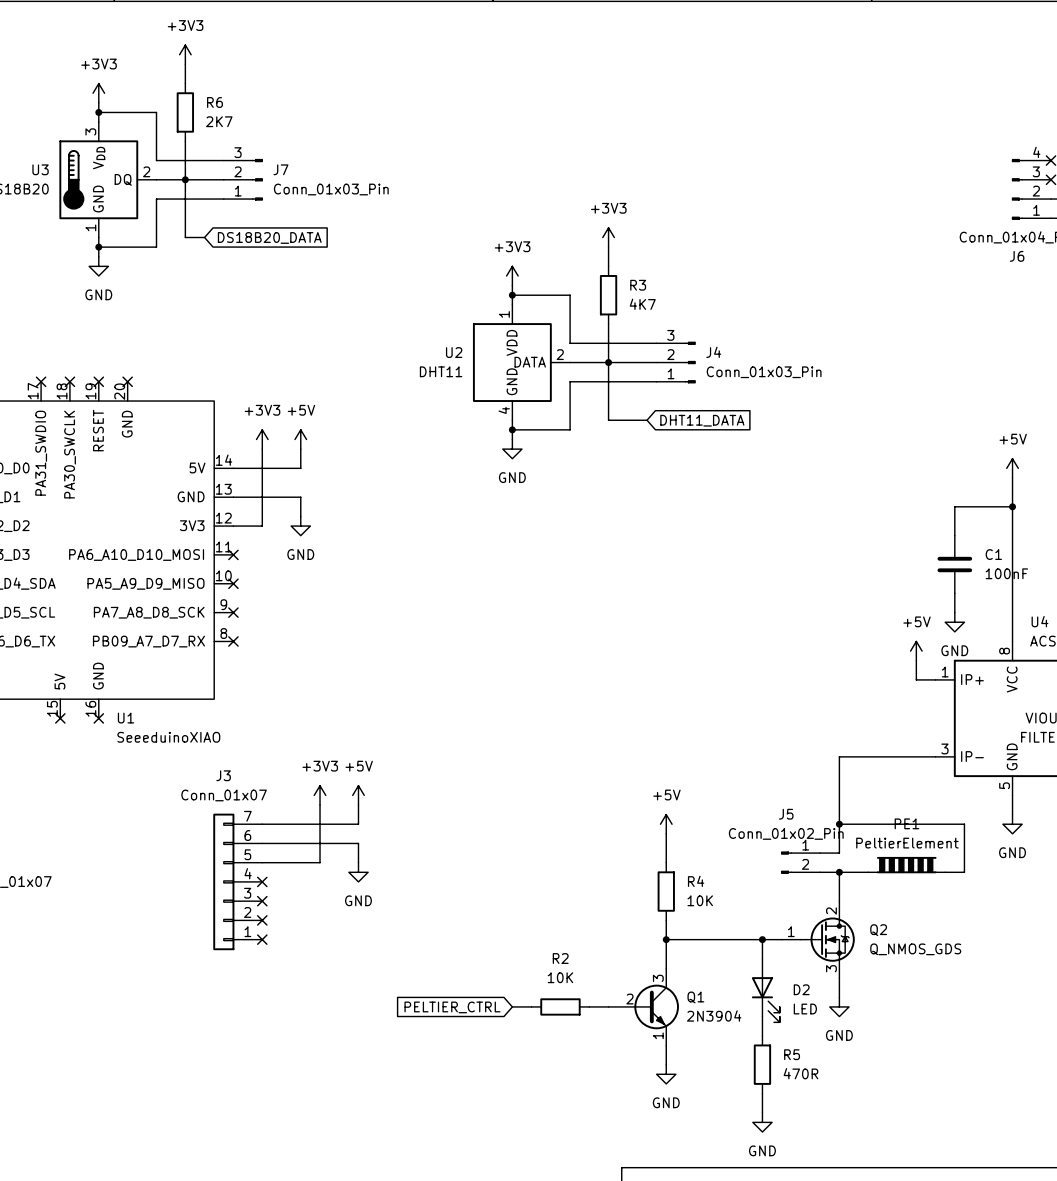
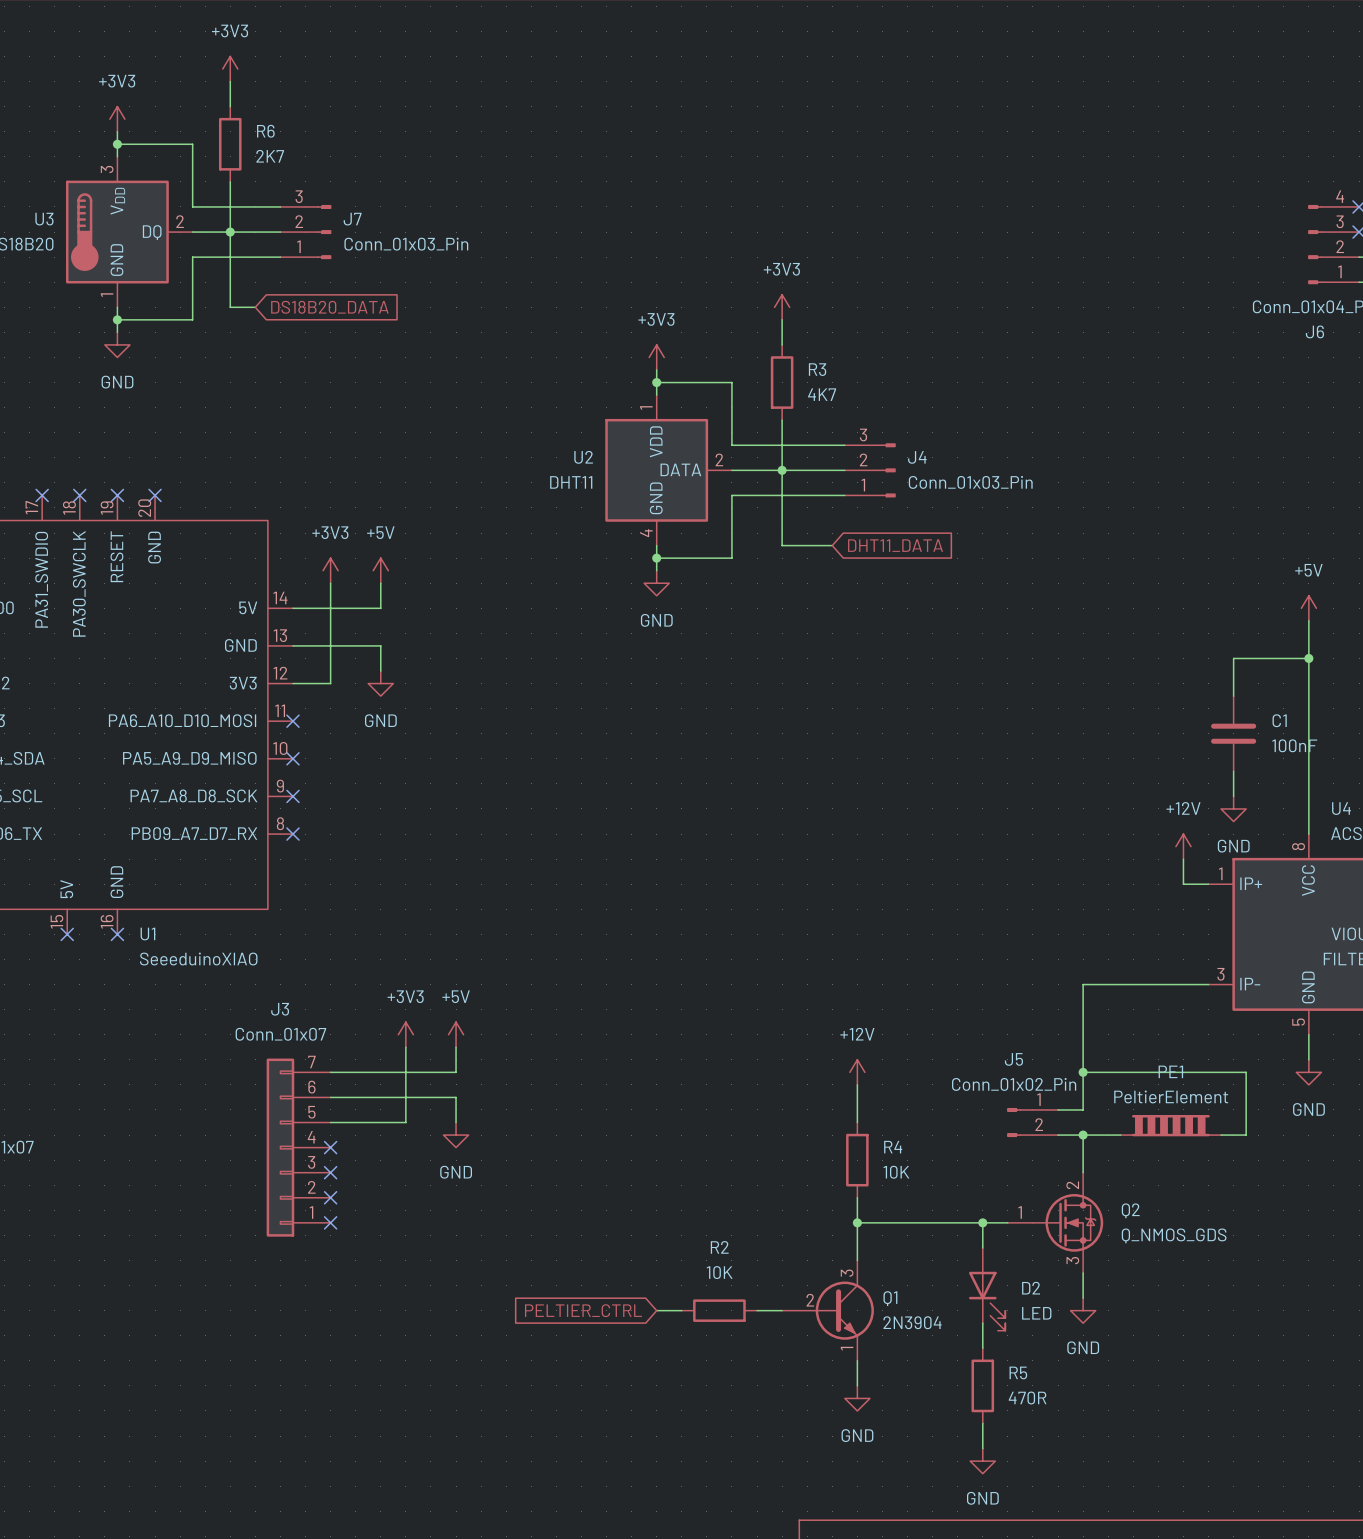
power symbol: +5V (916, 651) -> +12V (1183, 846)
power symbol: +5V (666, 824) -> +12V (857, 1072)

